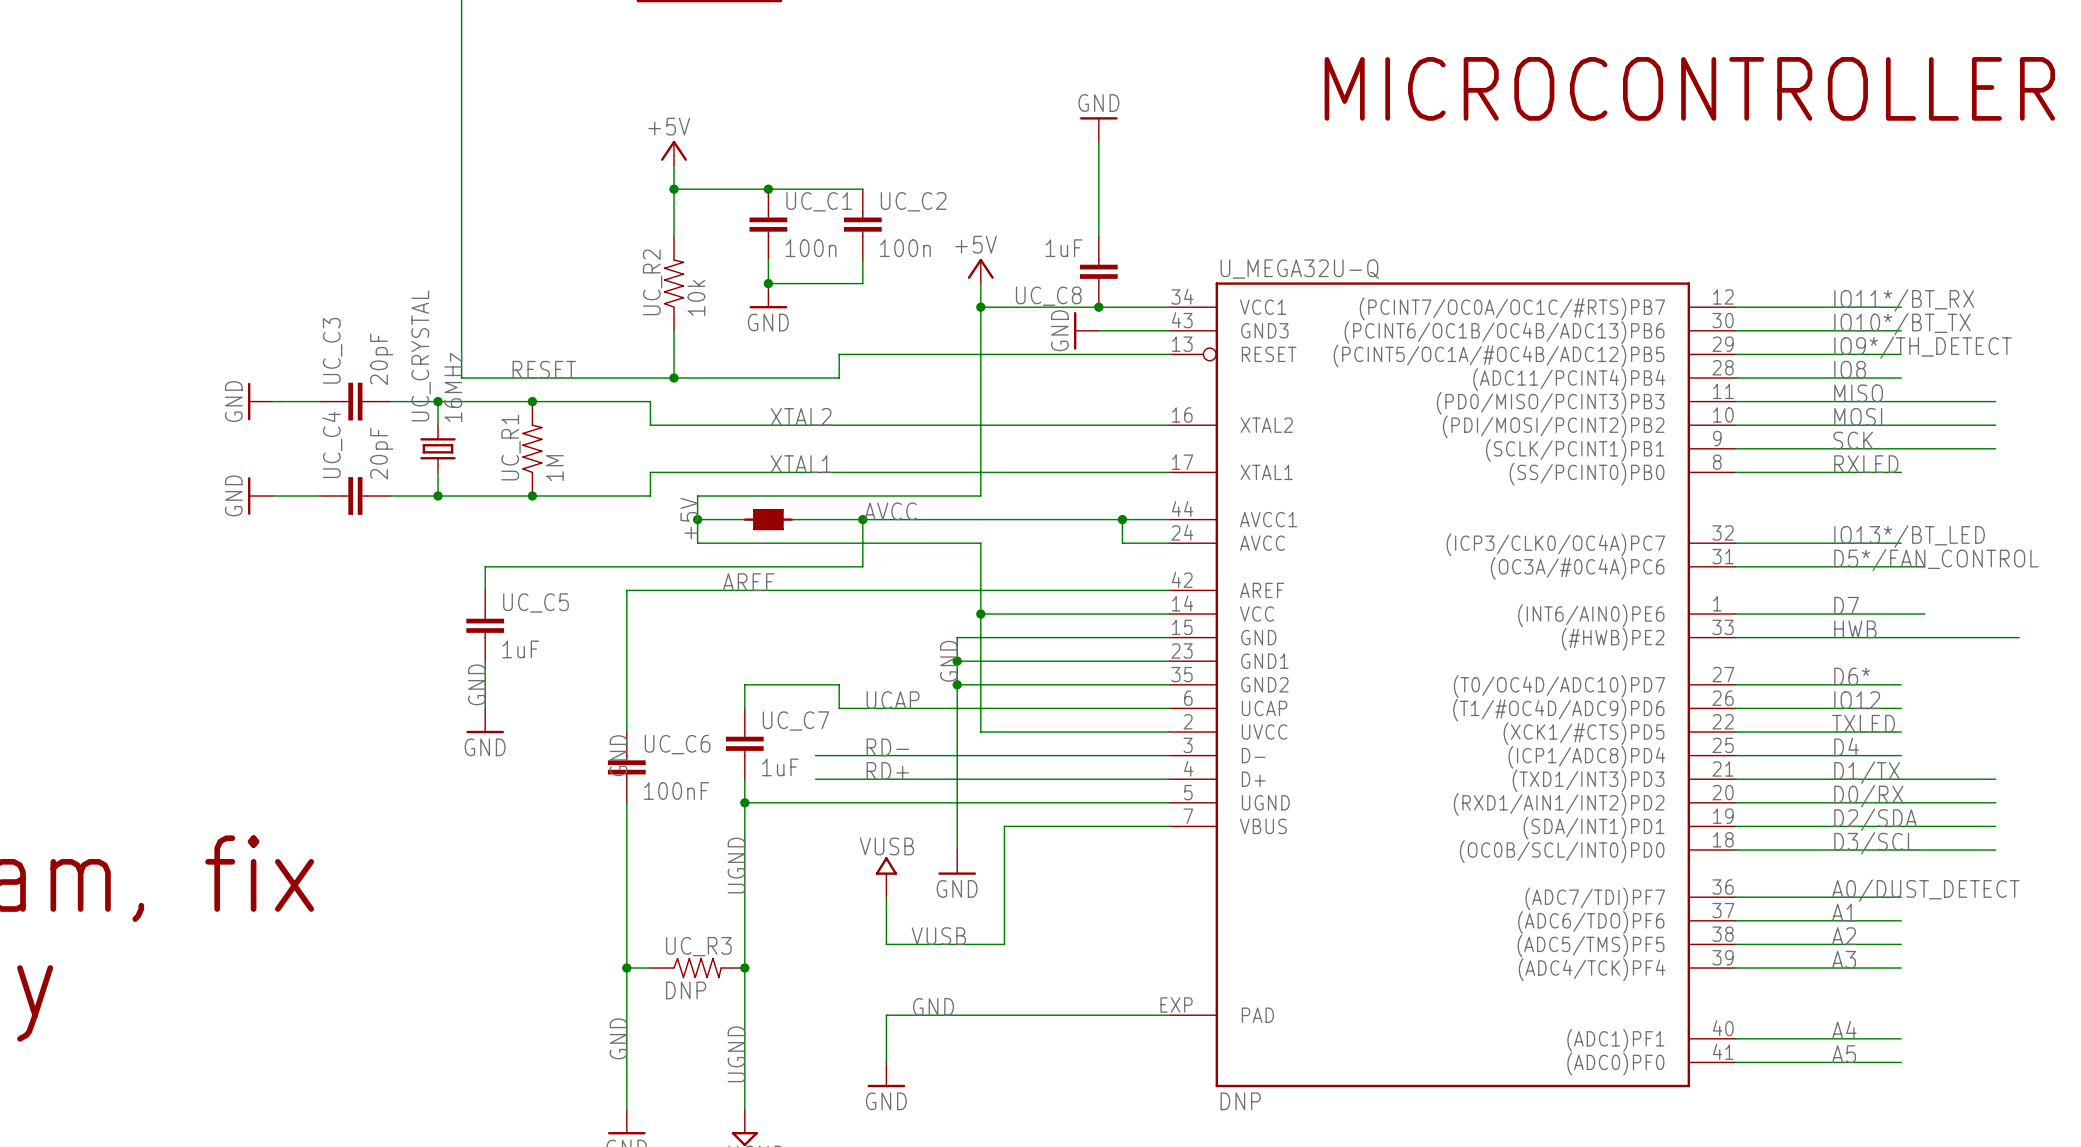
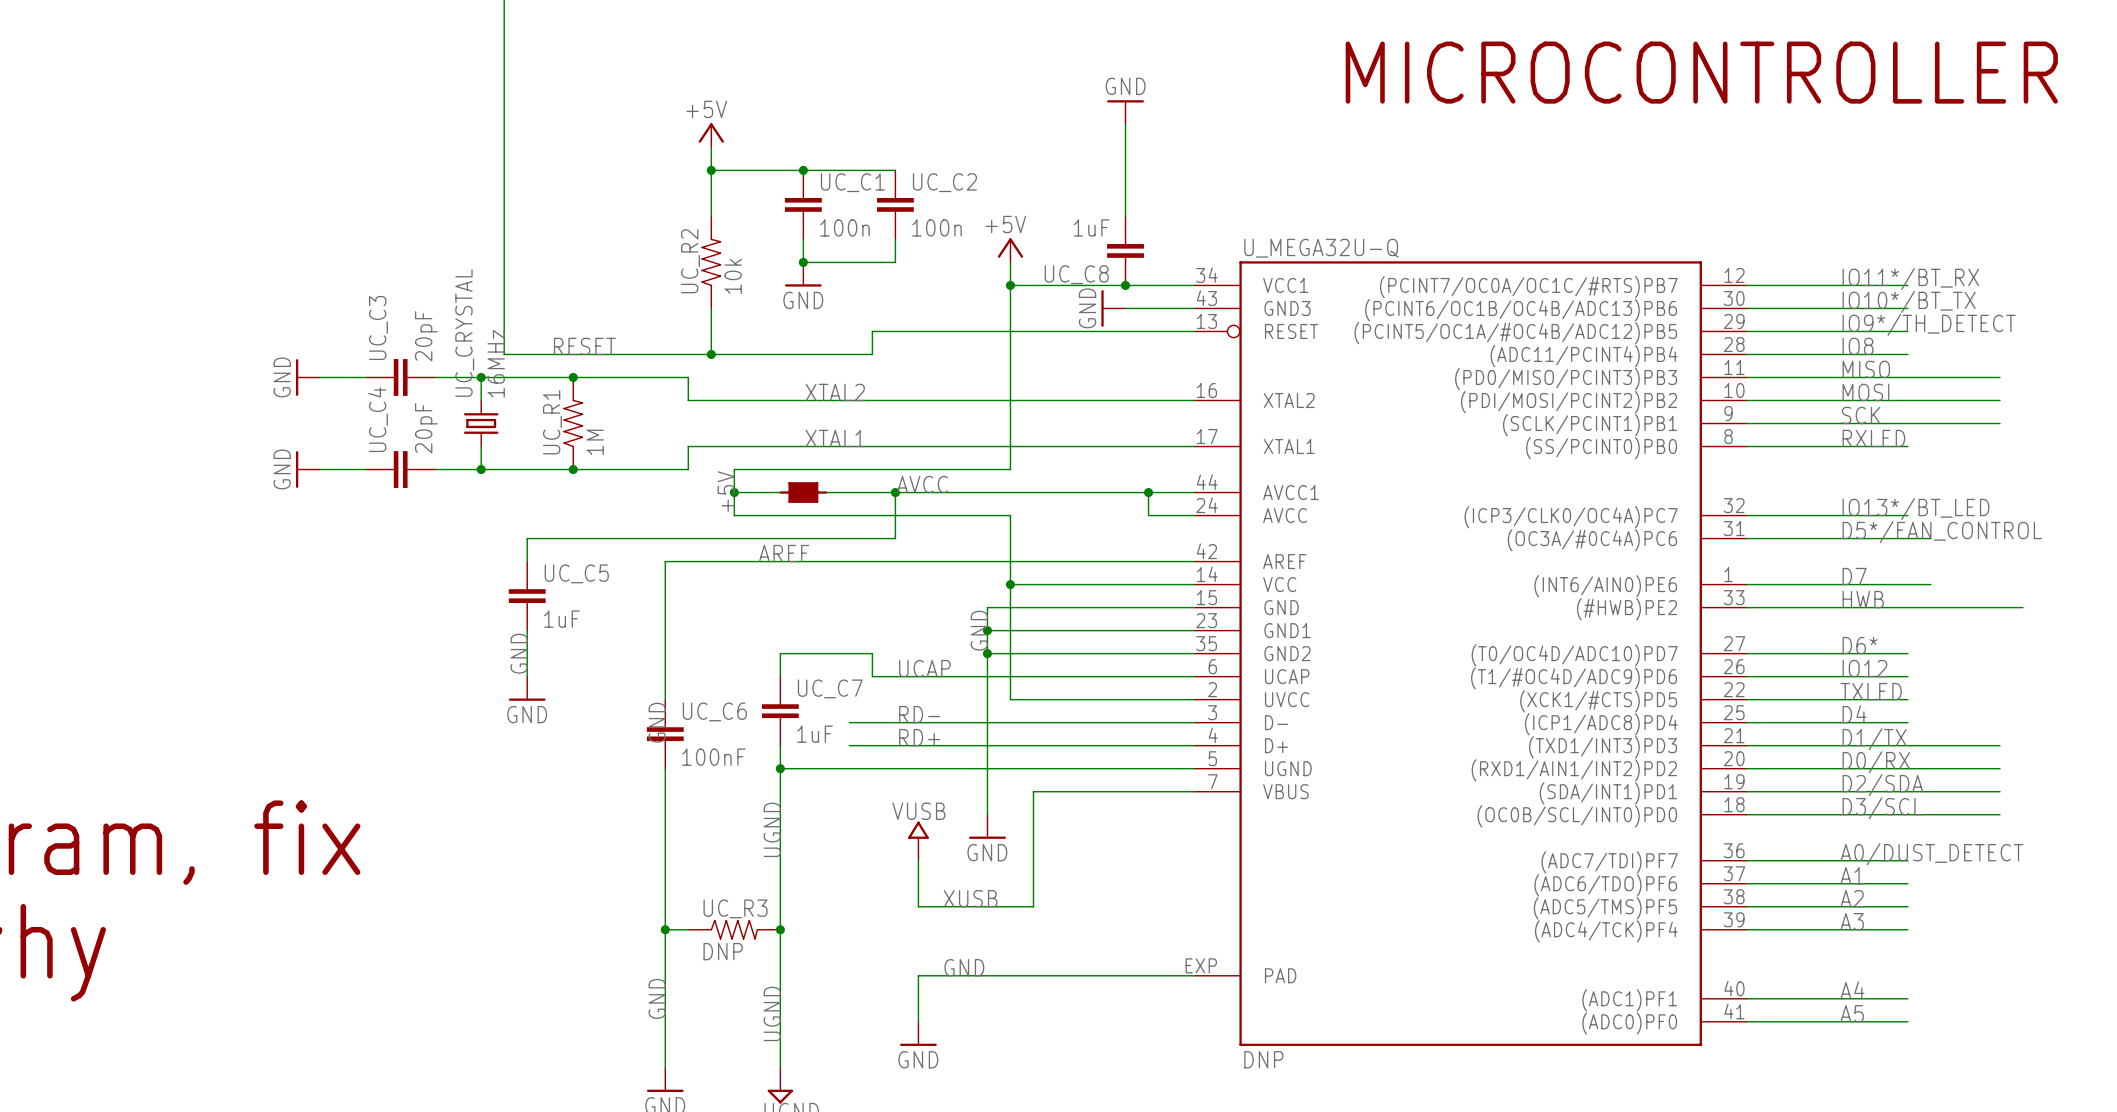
label: VUSB (938, 936) -> XUSB (970, 898)

